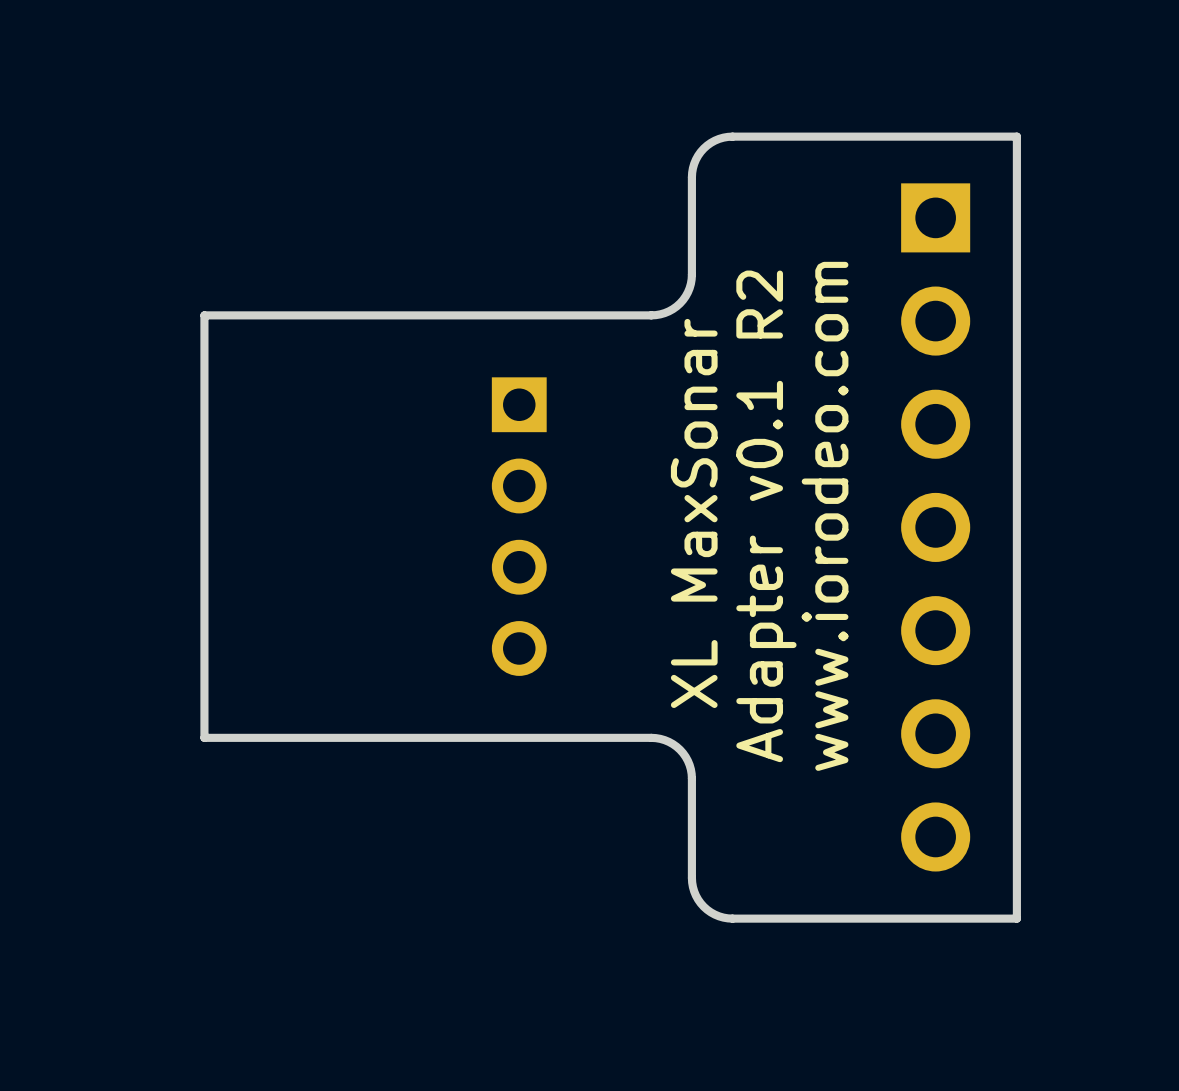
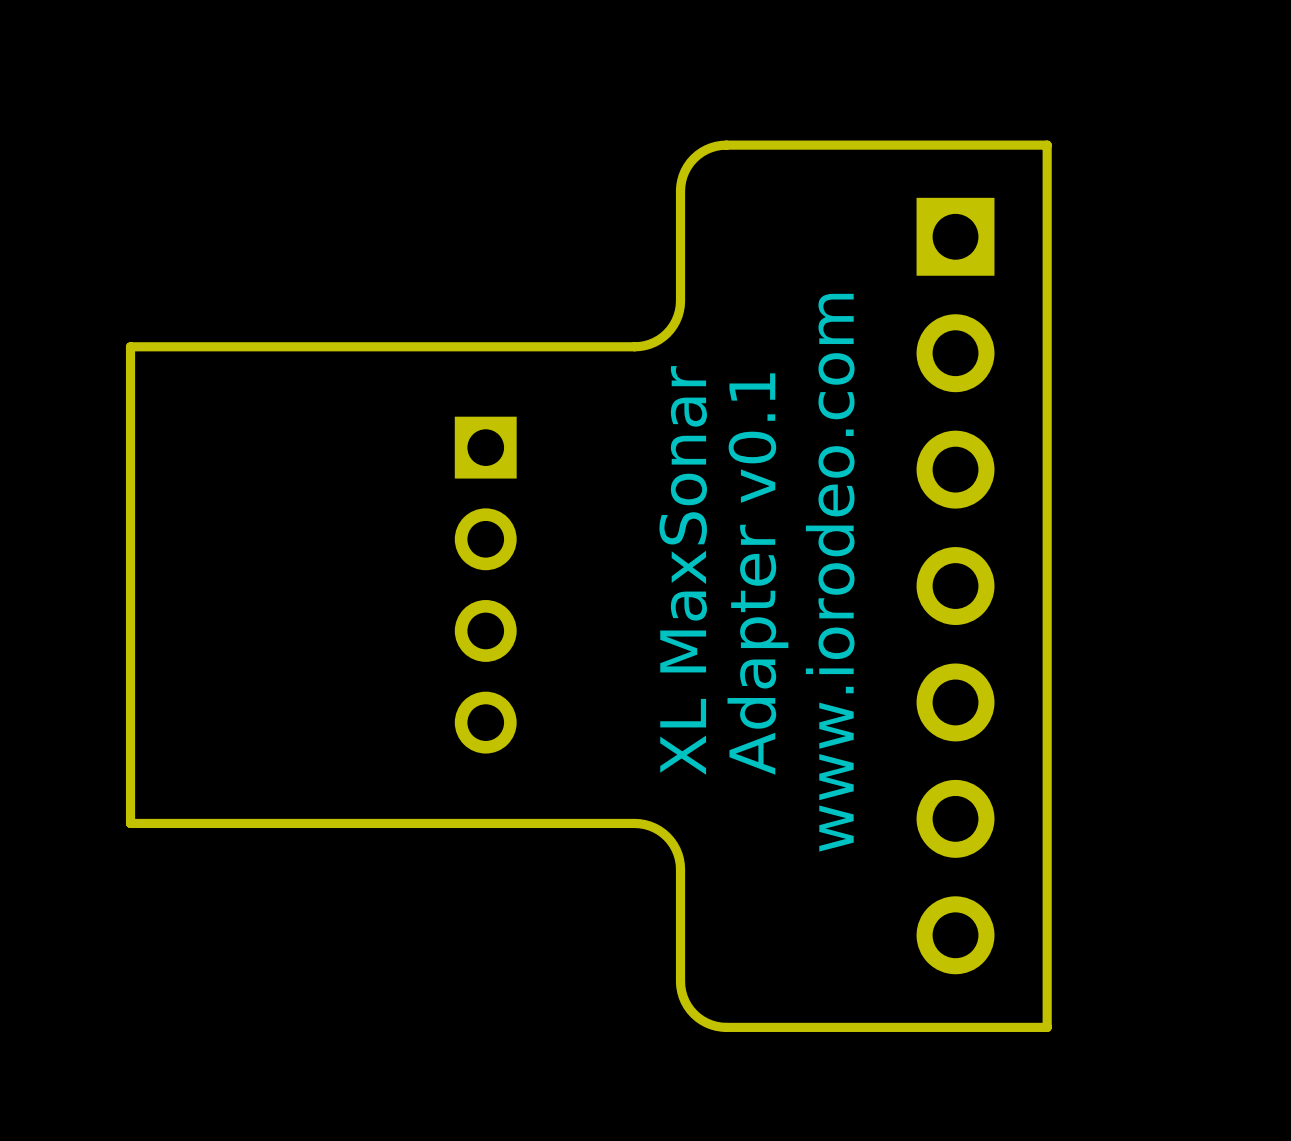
text: Adapter v0.1 R2 (766, 516) -> Adapter v0.1 (757, 574)

